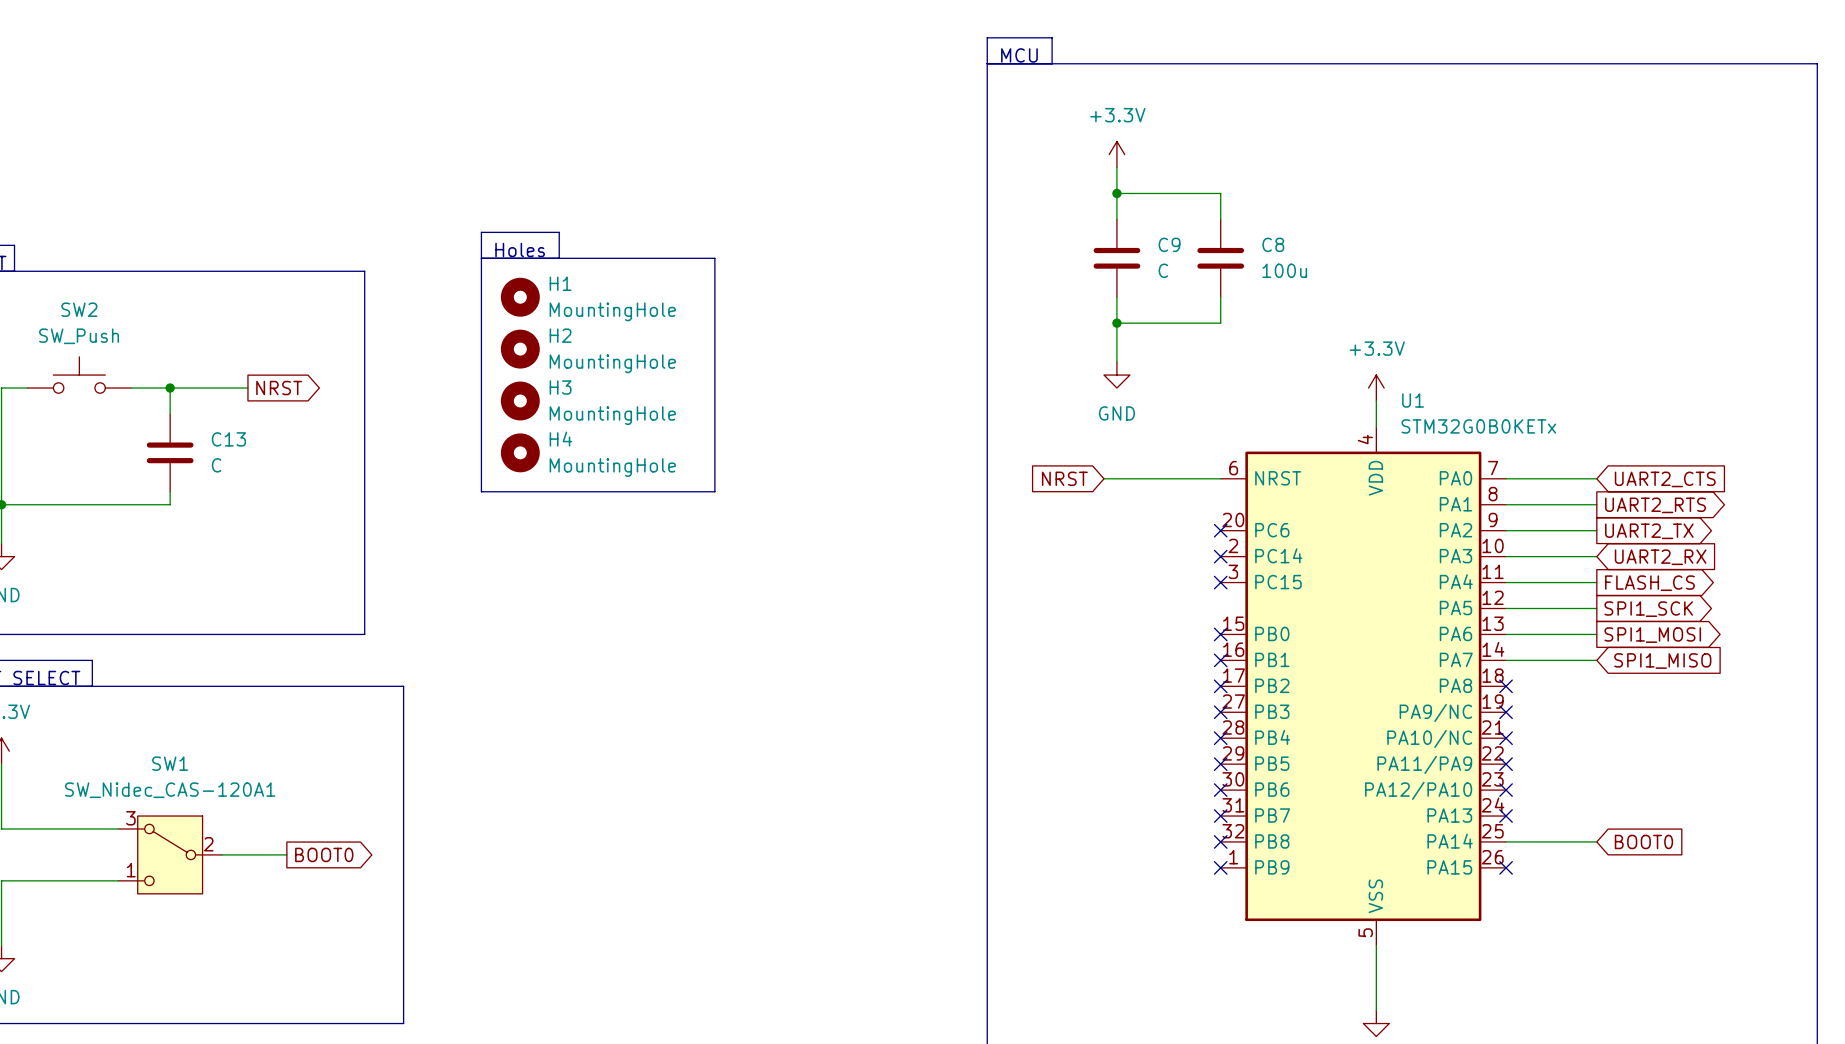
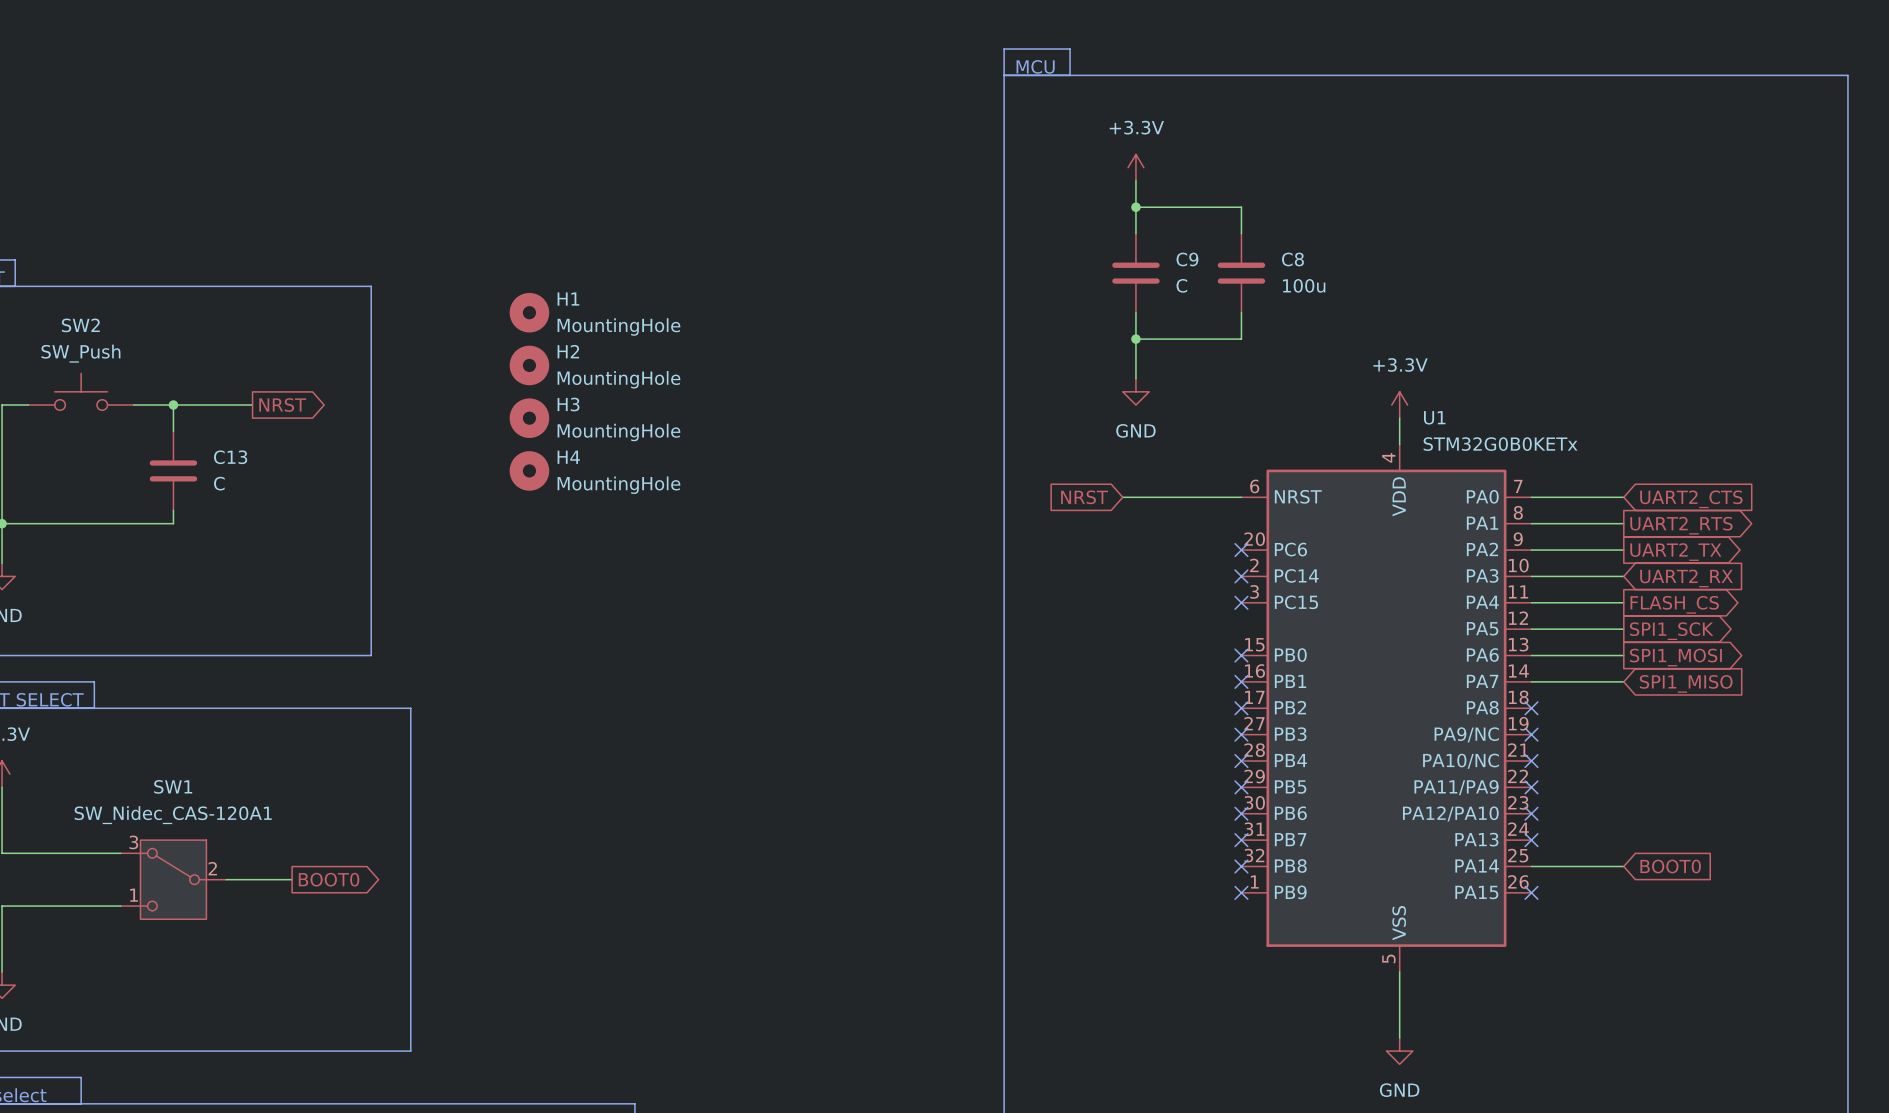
text: Holes (520, 249) -> none
line: (481, 258) (714, 258) (714, 491) (481, 491) (481, 232) (559, 232) (559, 258) -> none

